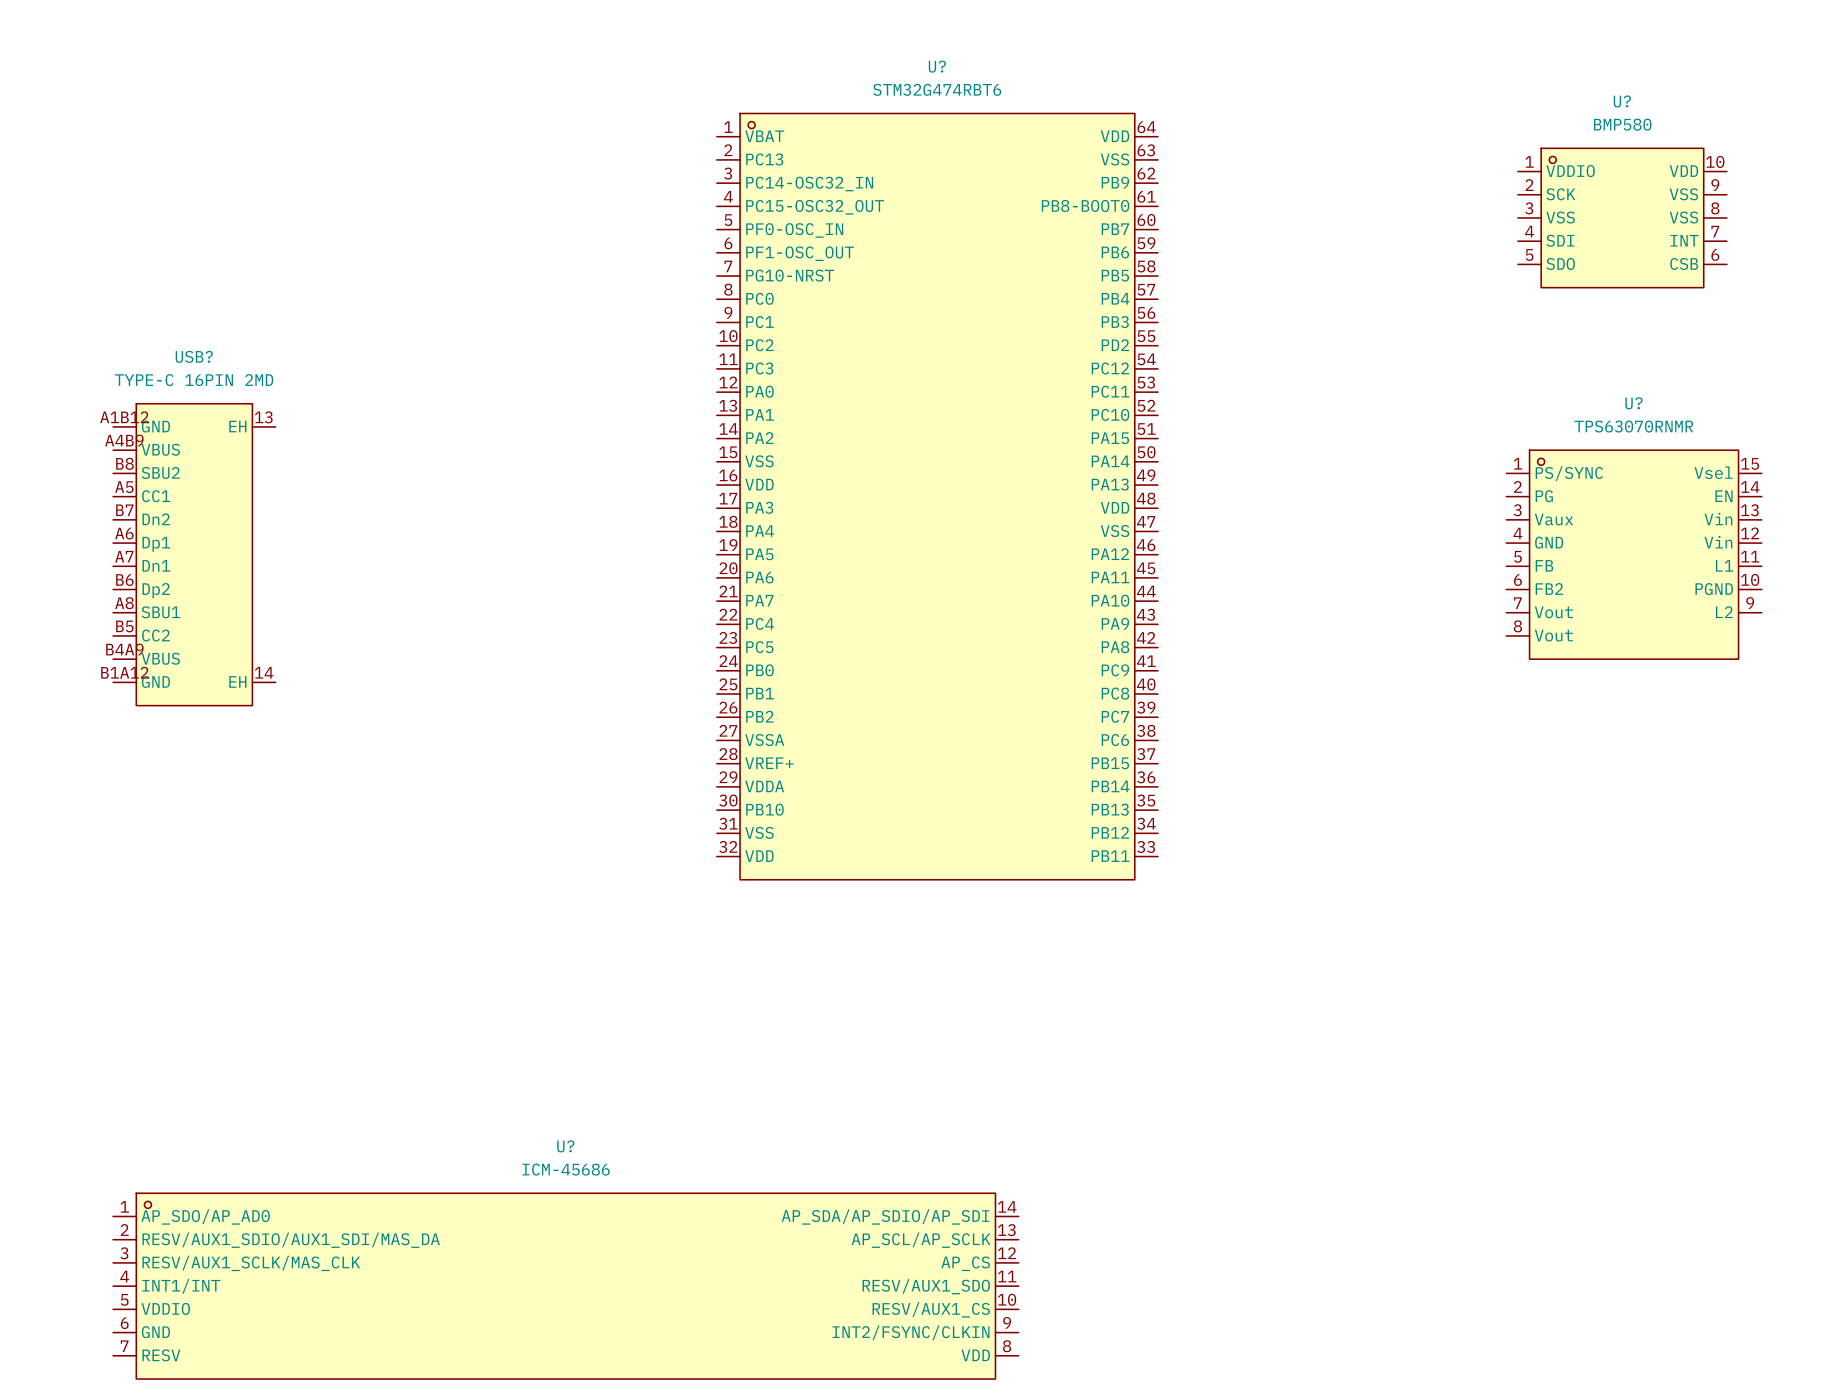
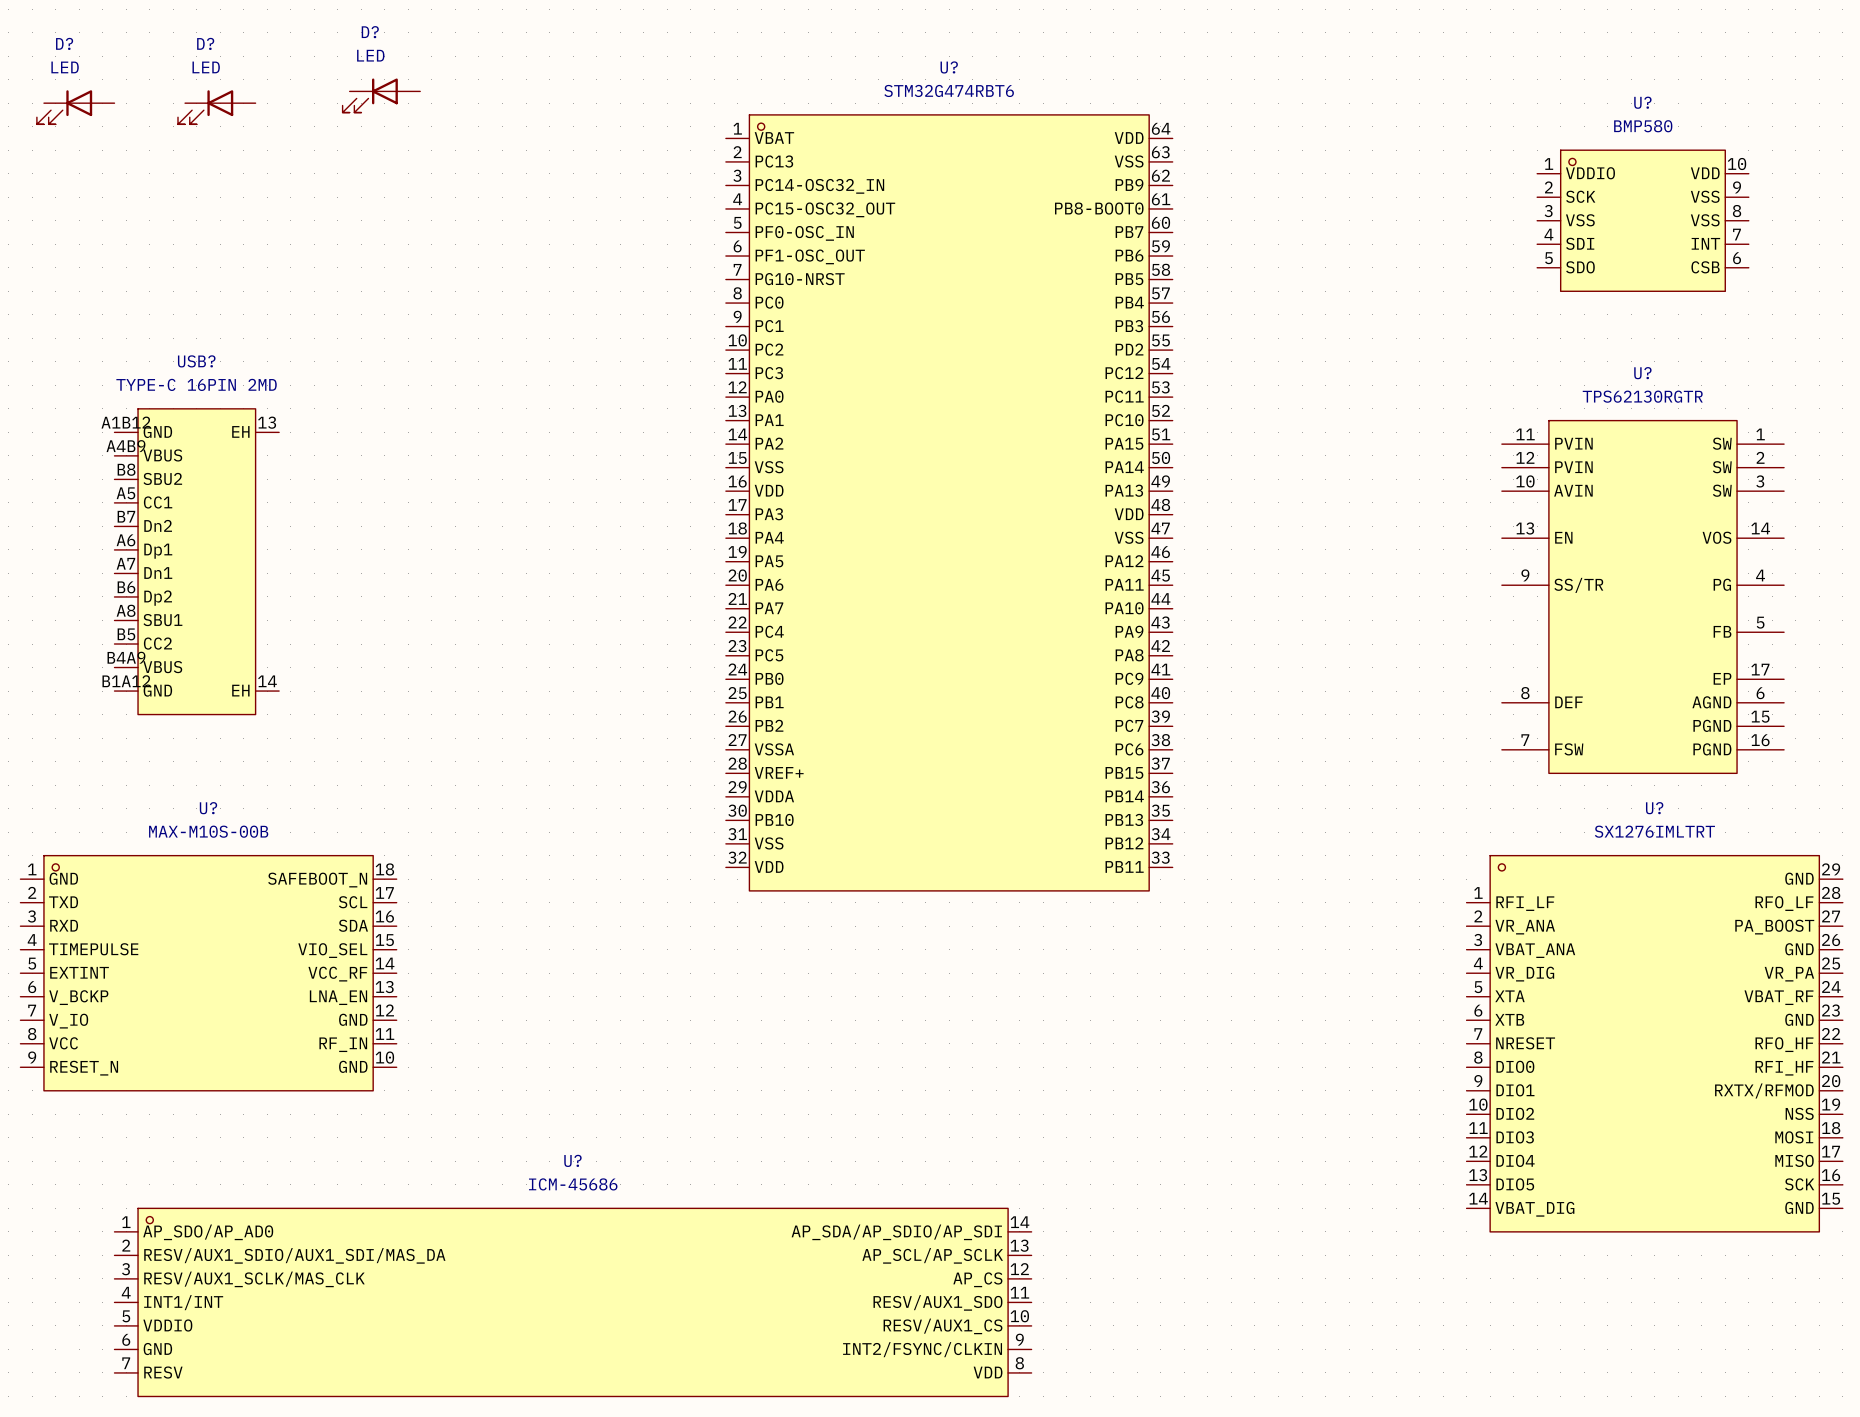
D?: none -> LED (381, 95)
D?: none -> LED (75, 107)
D?: none -> LED (216, 107)
U?: TPS63070RNMR (1634, 554) -> none
U?: none -> TPS62130RGTR (1642, 596)
U?: none -> MAX-M10S-00B (208, 973)
U?: none -> SX1276IMLTRT (1654, 1043)

